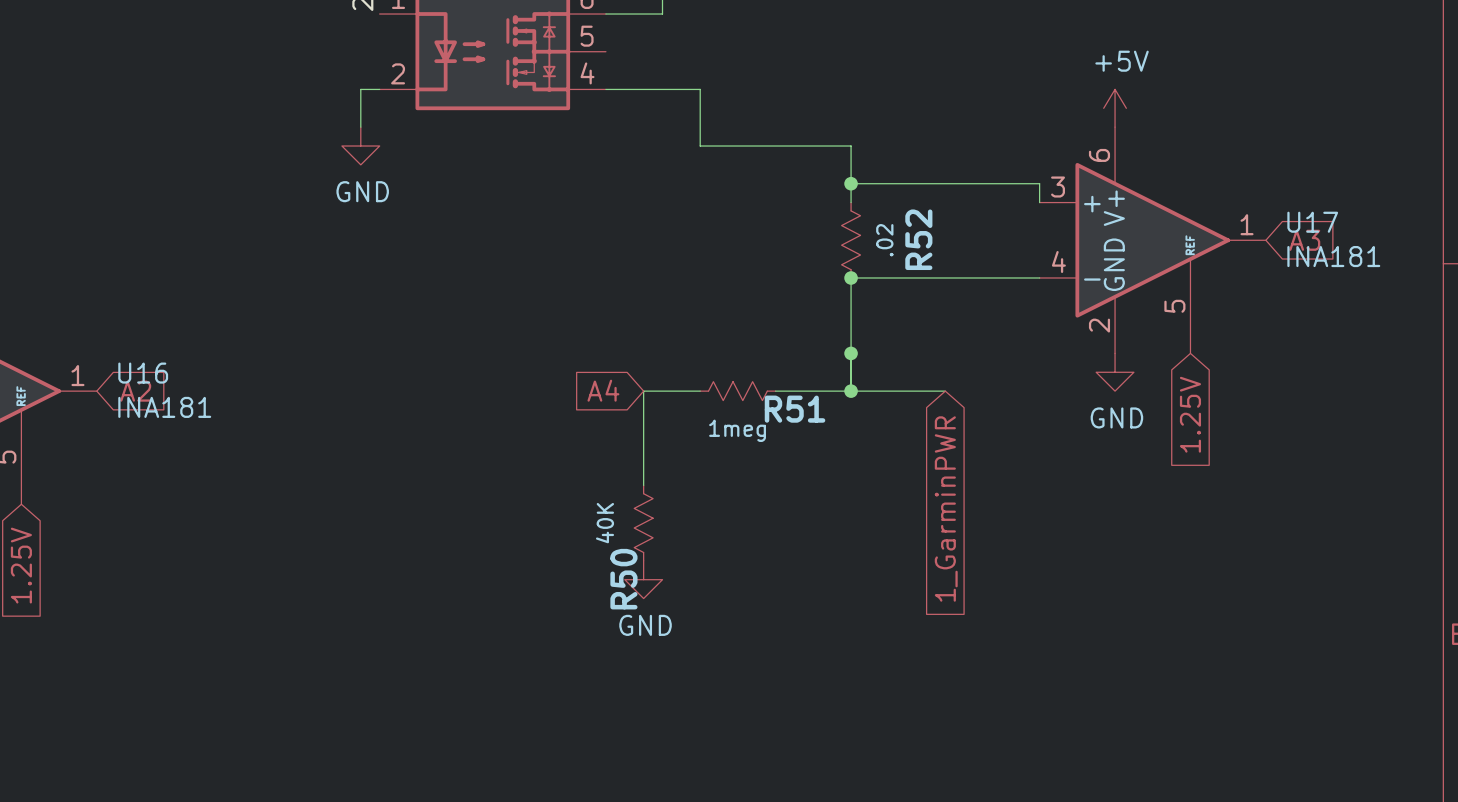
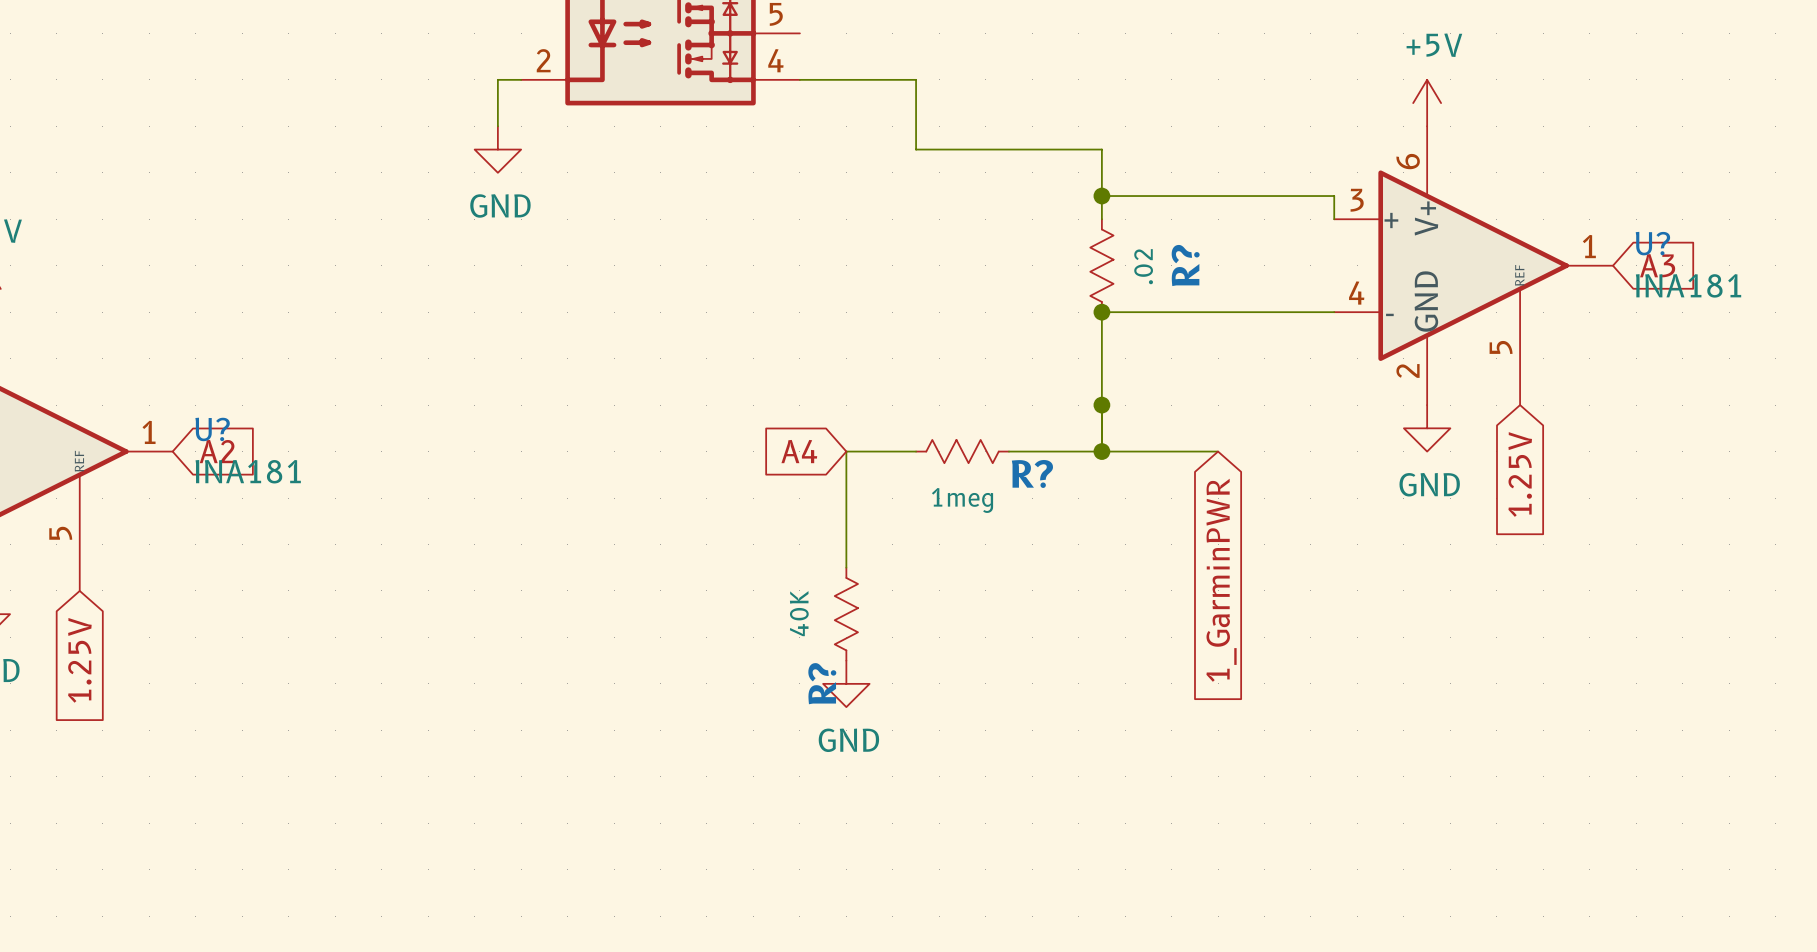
U17 name: U17 (1312, 222) -> U? (1652, 243)
R52 name: R52 (918, 239) -> R? (1185, 265)
U16 name: U16 (143, 373) -> U? (212, 429)
R51 name: R51 (795, 409) -> R? (1032, 473)
R50 name: R50 (623, 579) -> R? (822, 683)

